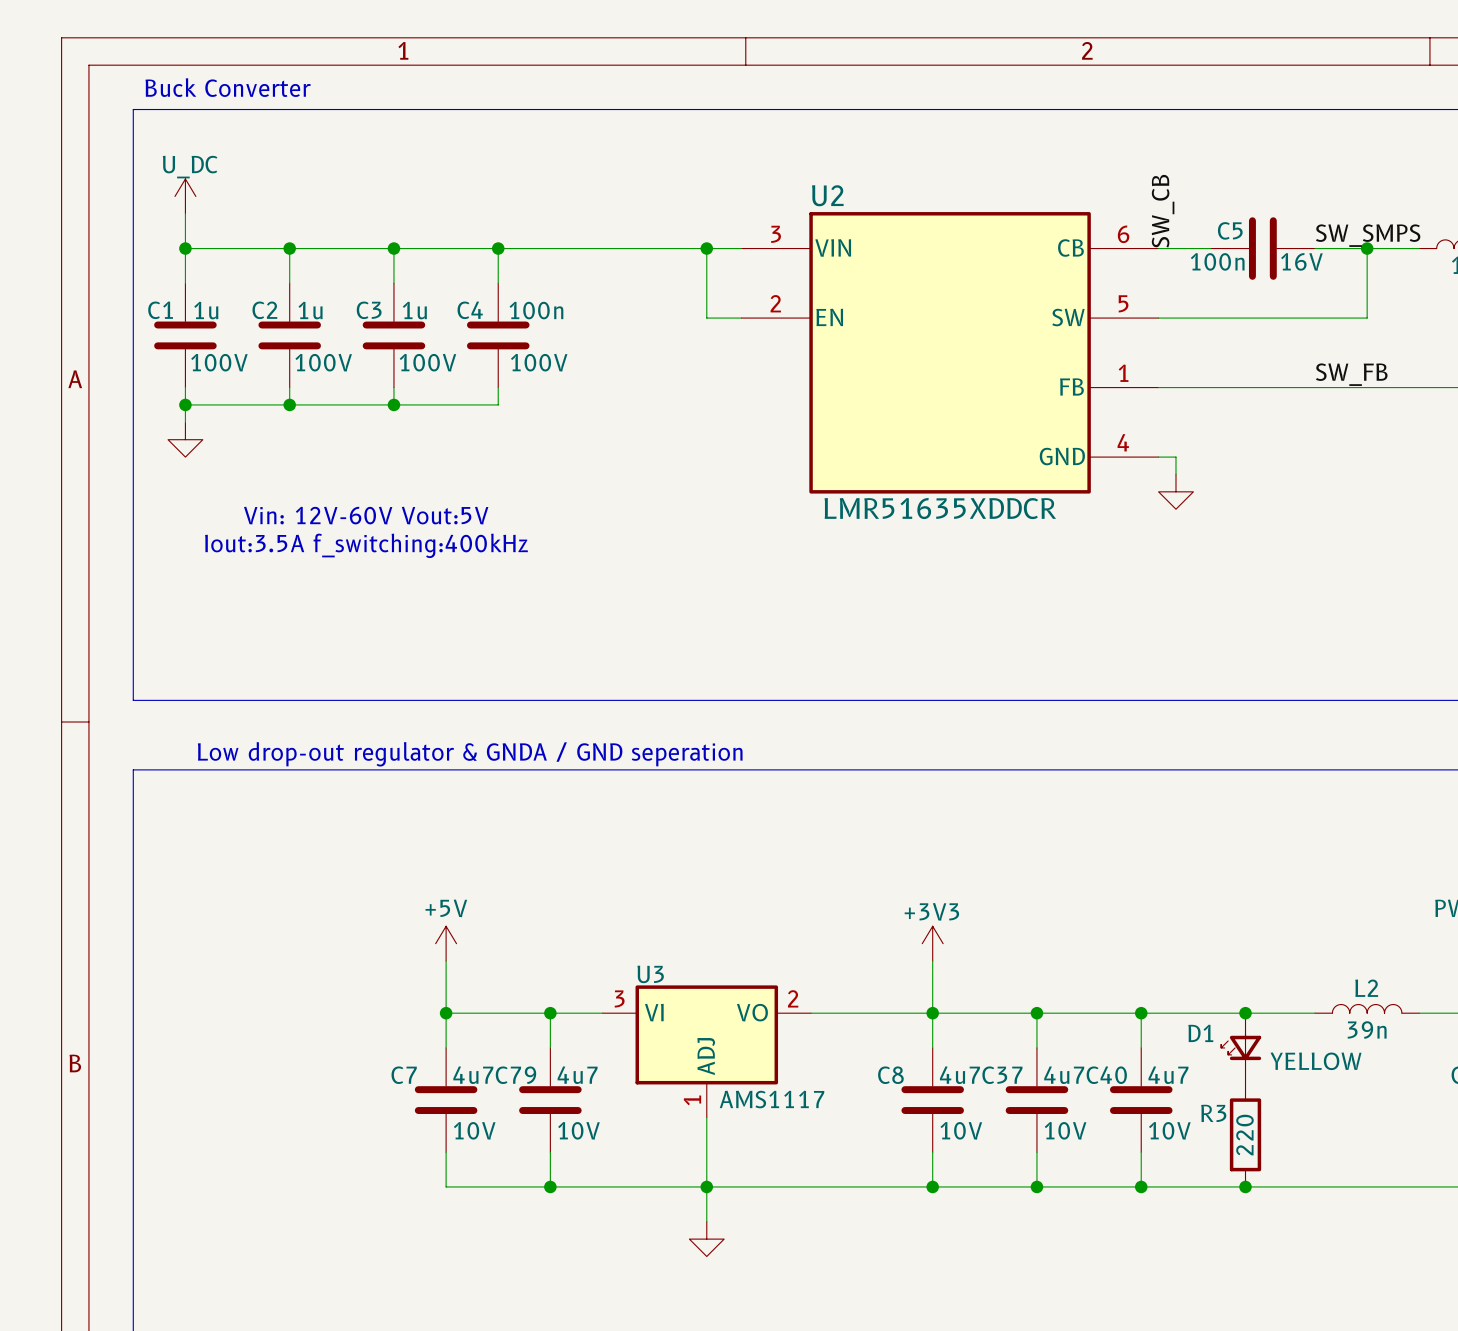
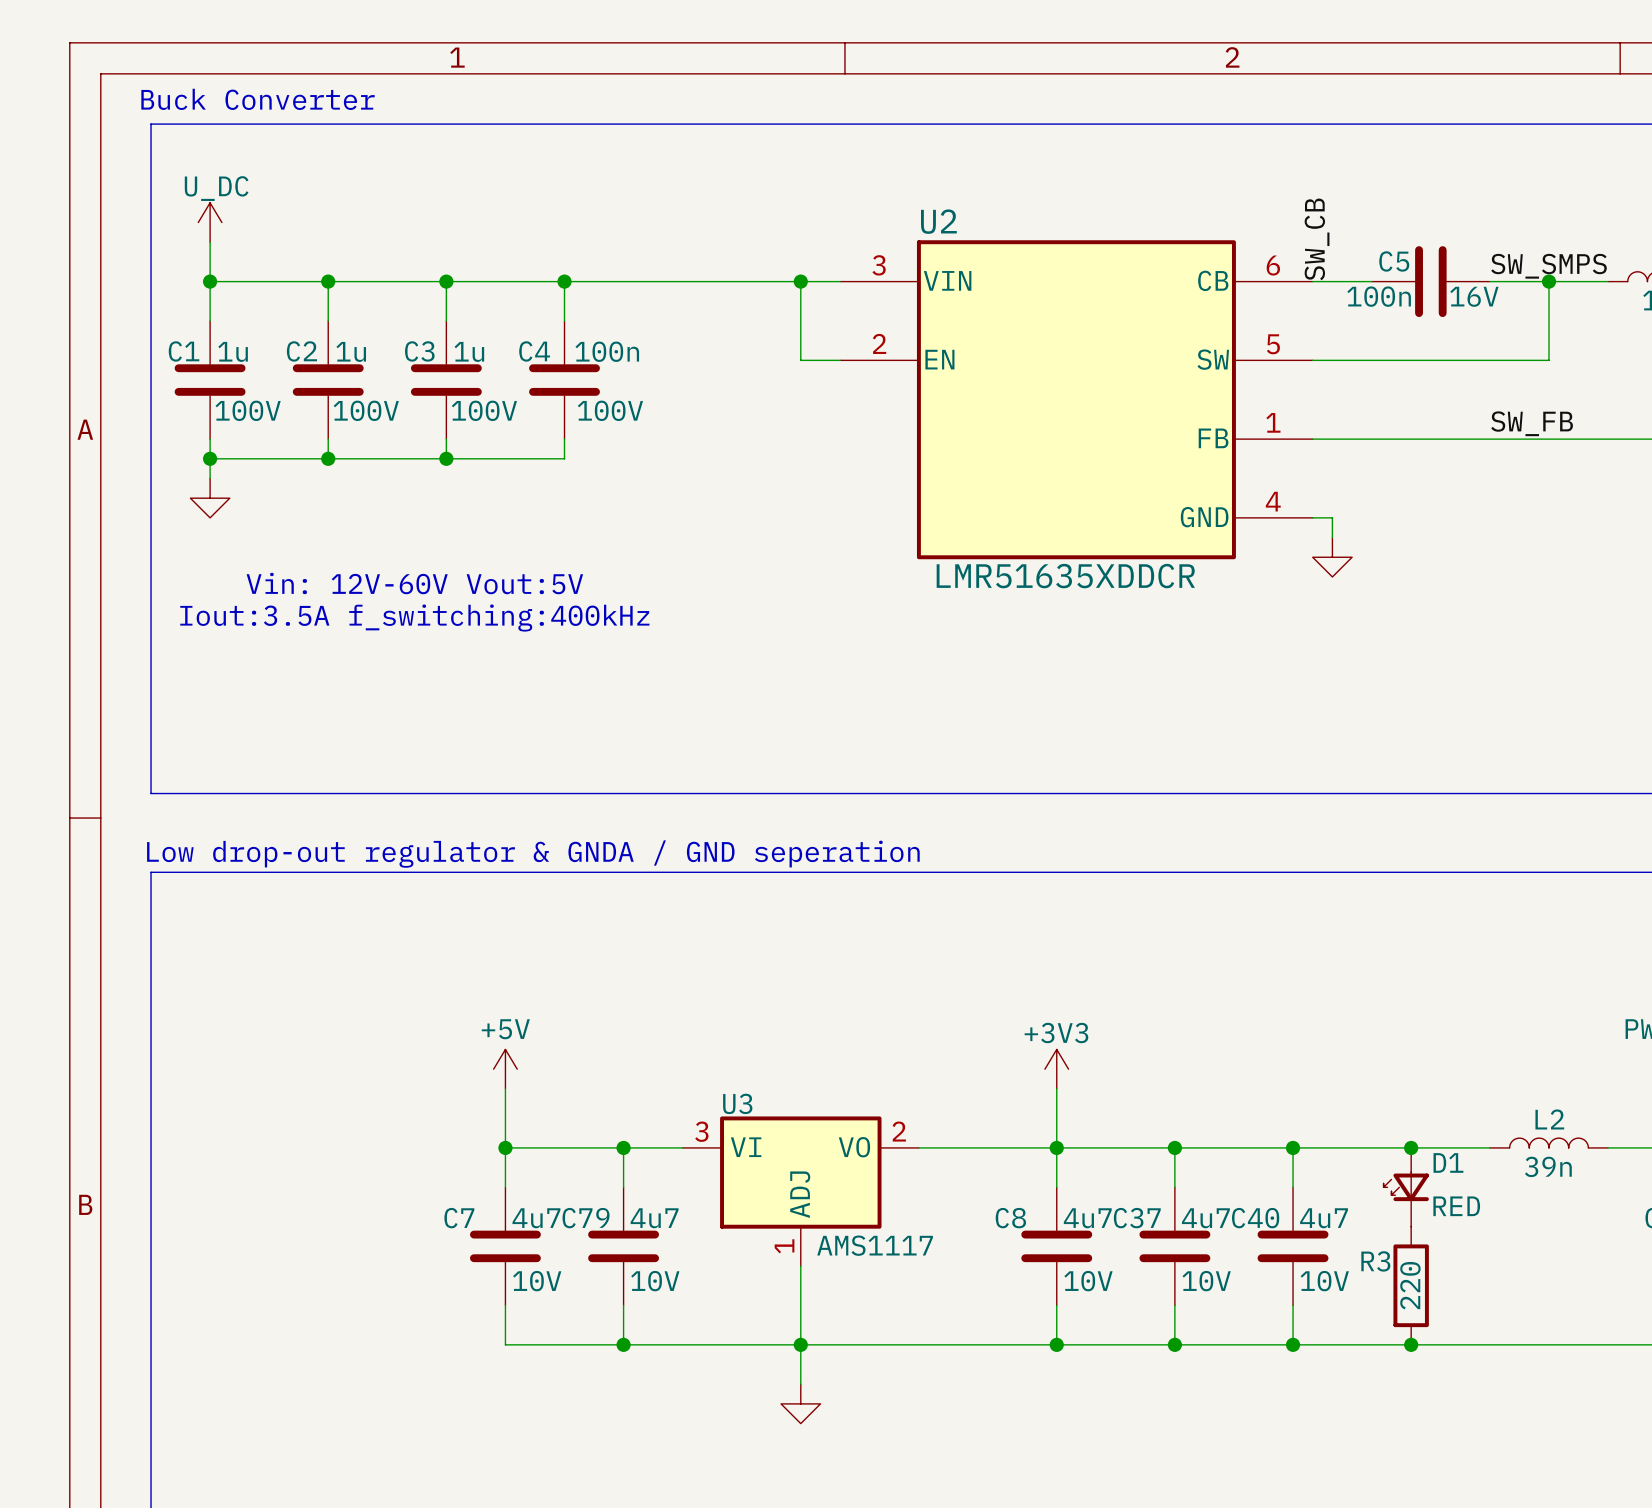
D1 name position: D1 (1200, 1033) -> D1 (1448, 1162)
D1 value: YELLOW (1315, 1061) -> RED (1456, 1206)

